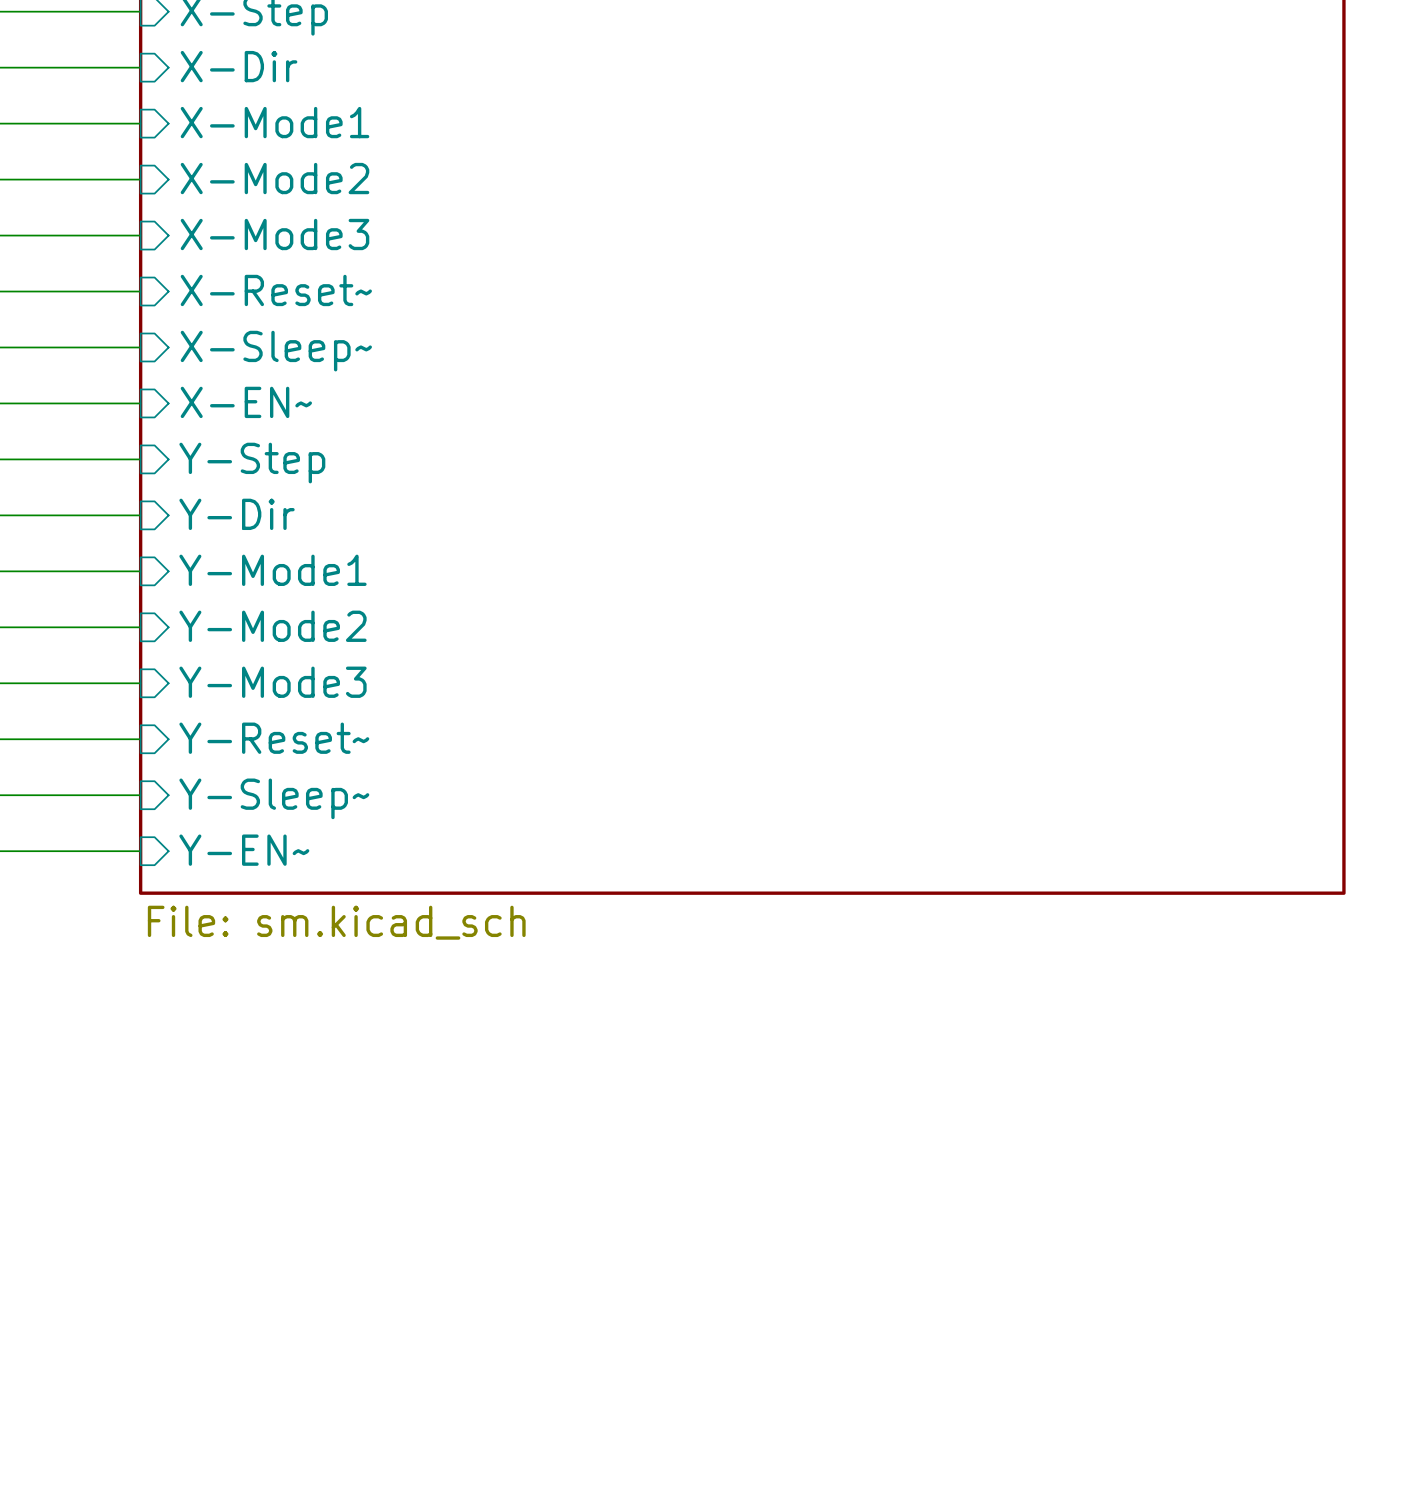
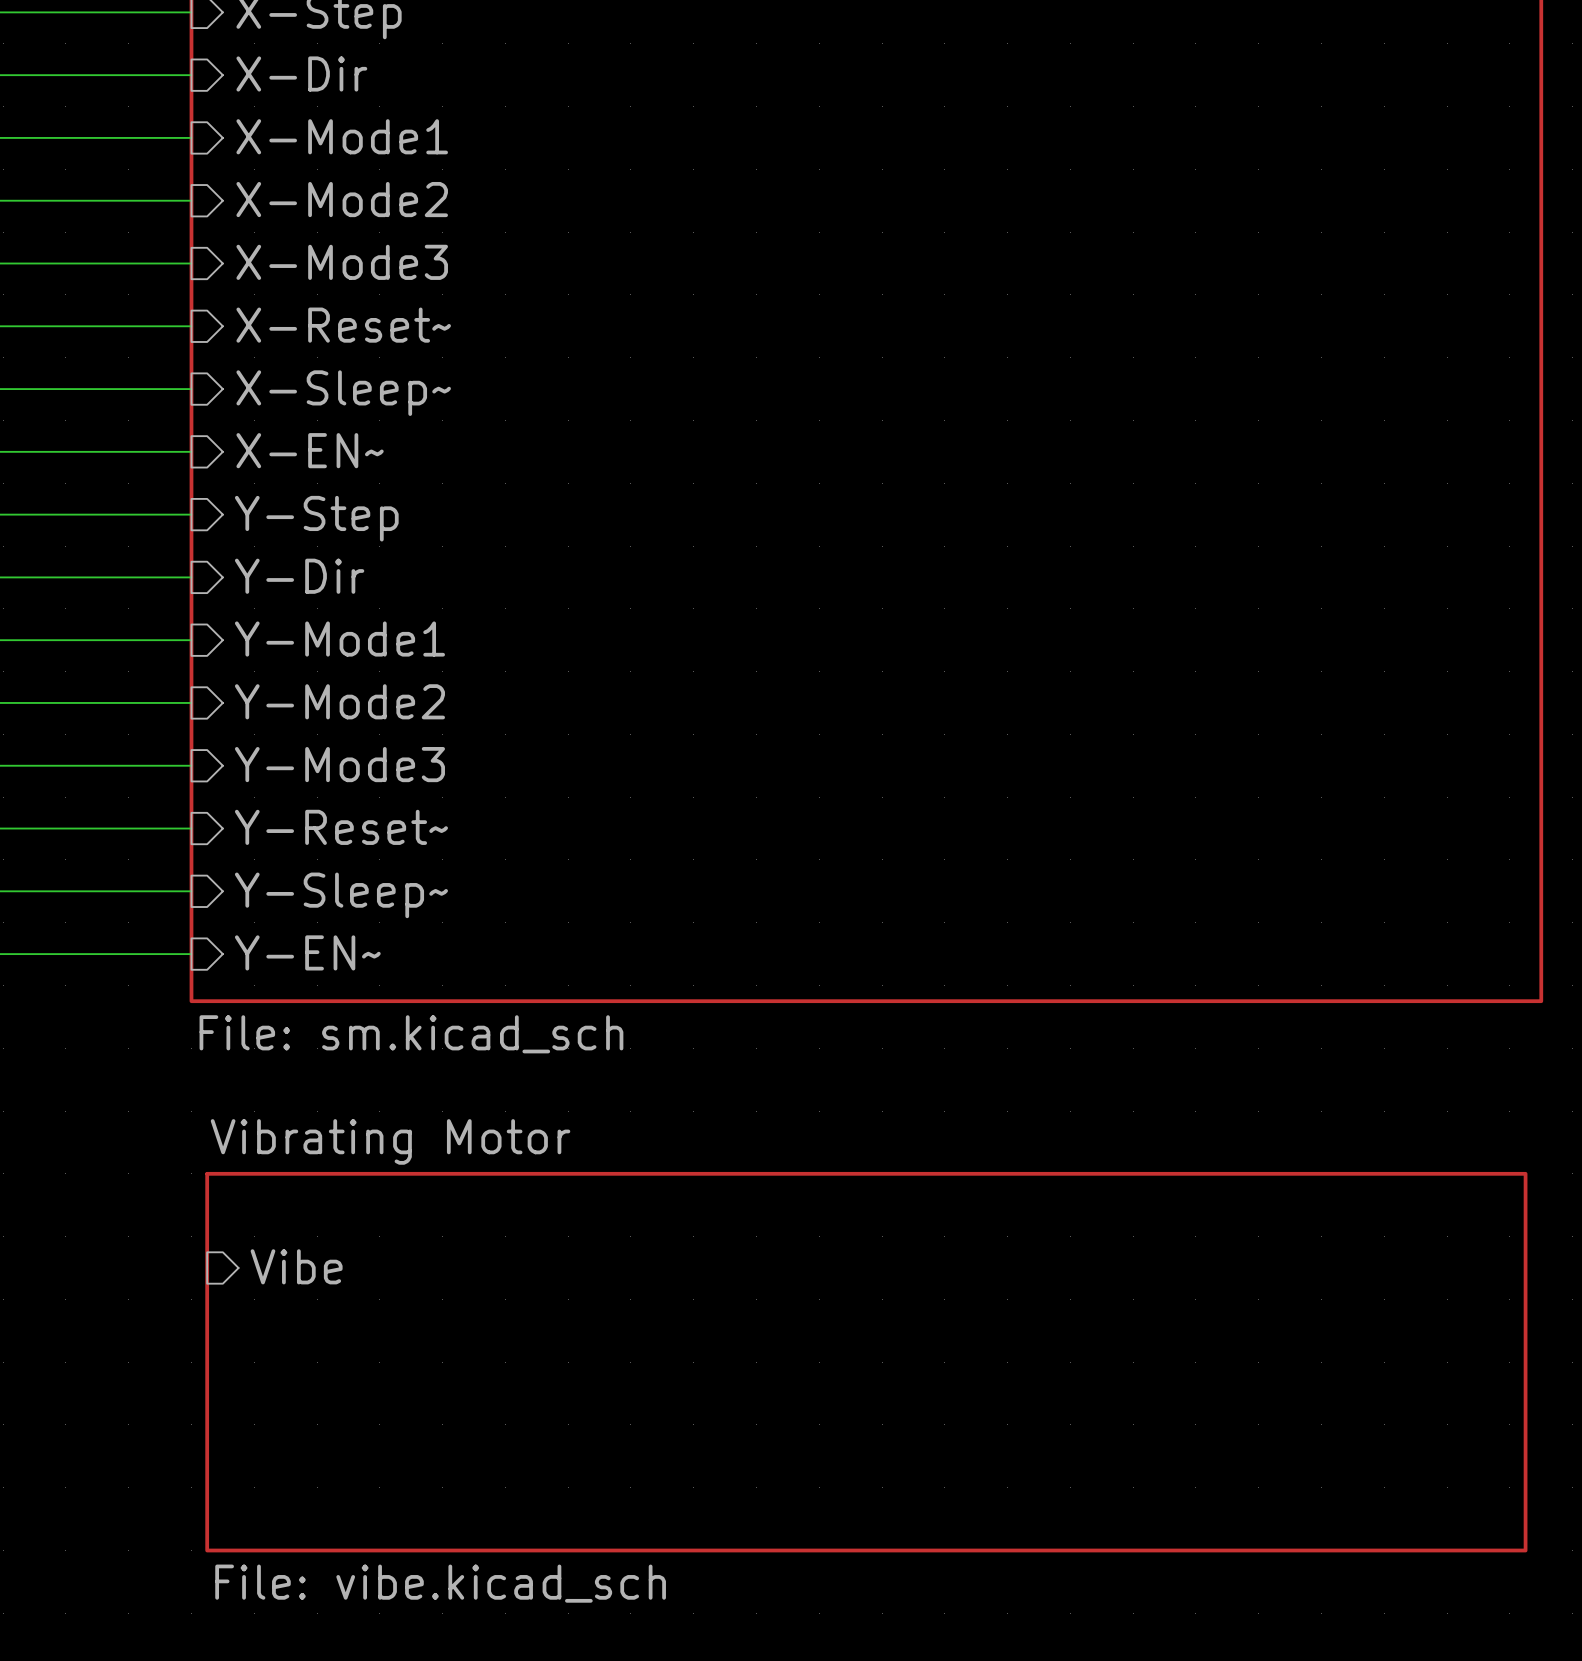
sheet pin: none -> Vibe (296, 1266)
sheet Vibrating Motor: none -> File: vibe.kicad_sch (866, 1362)

